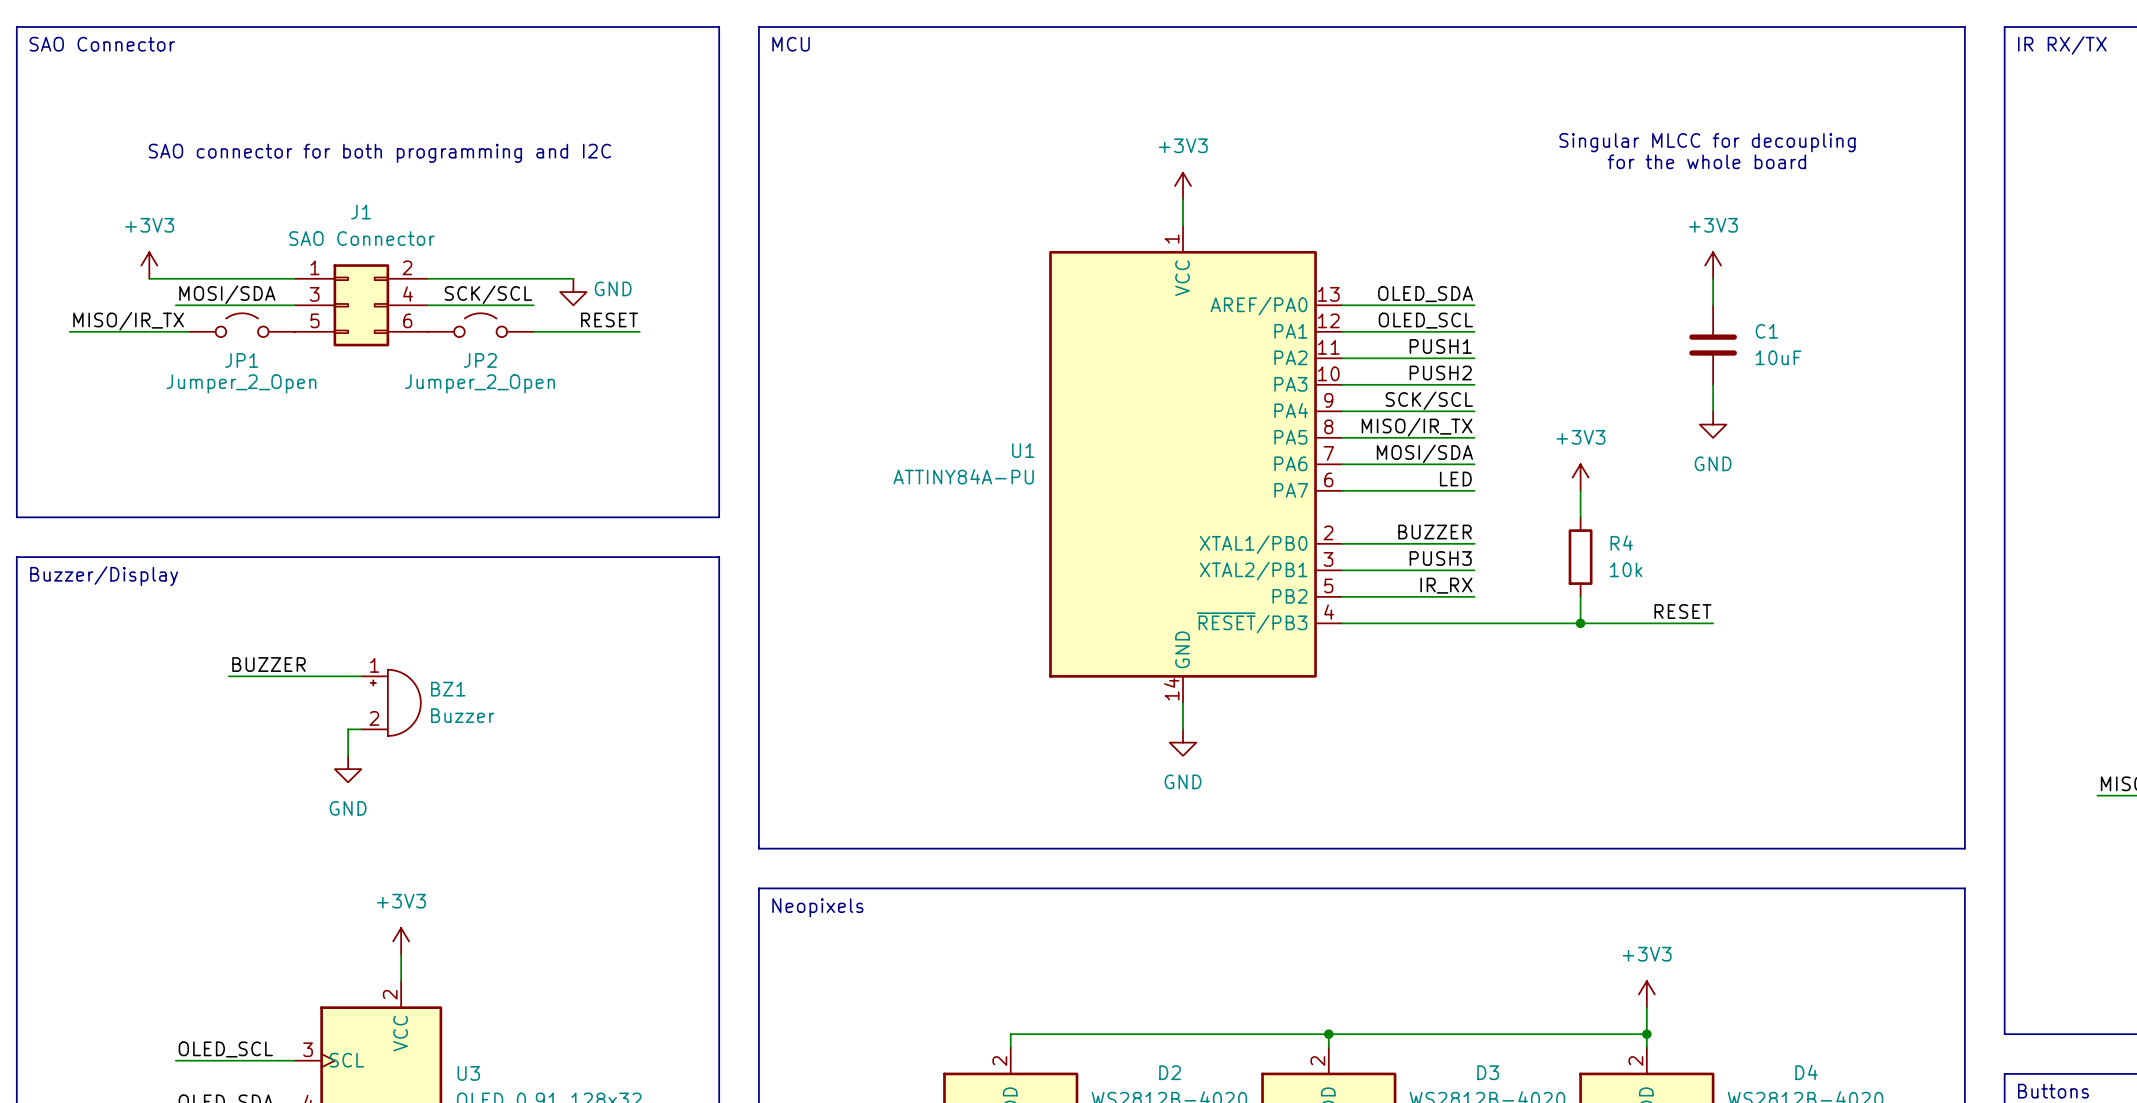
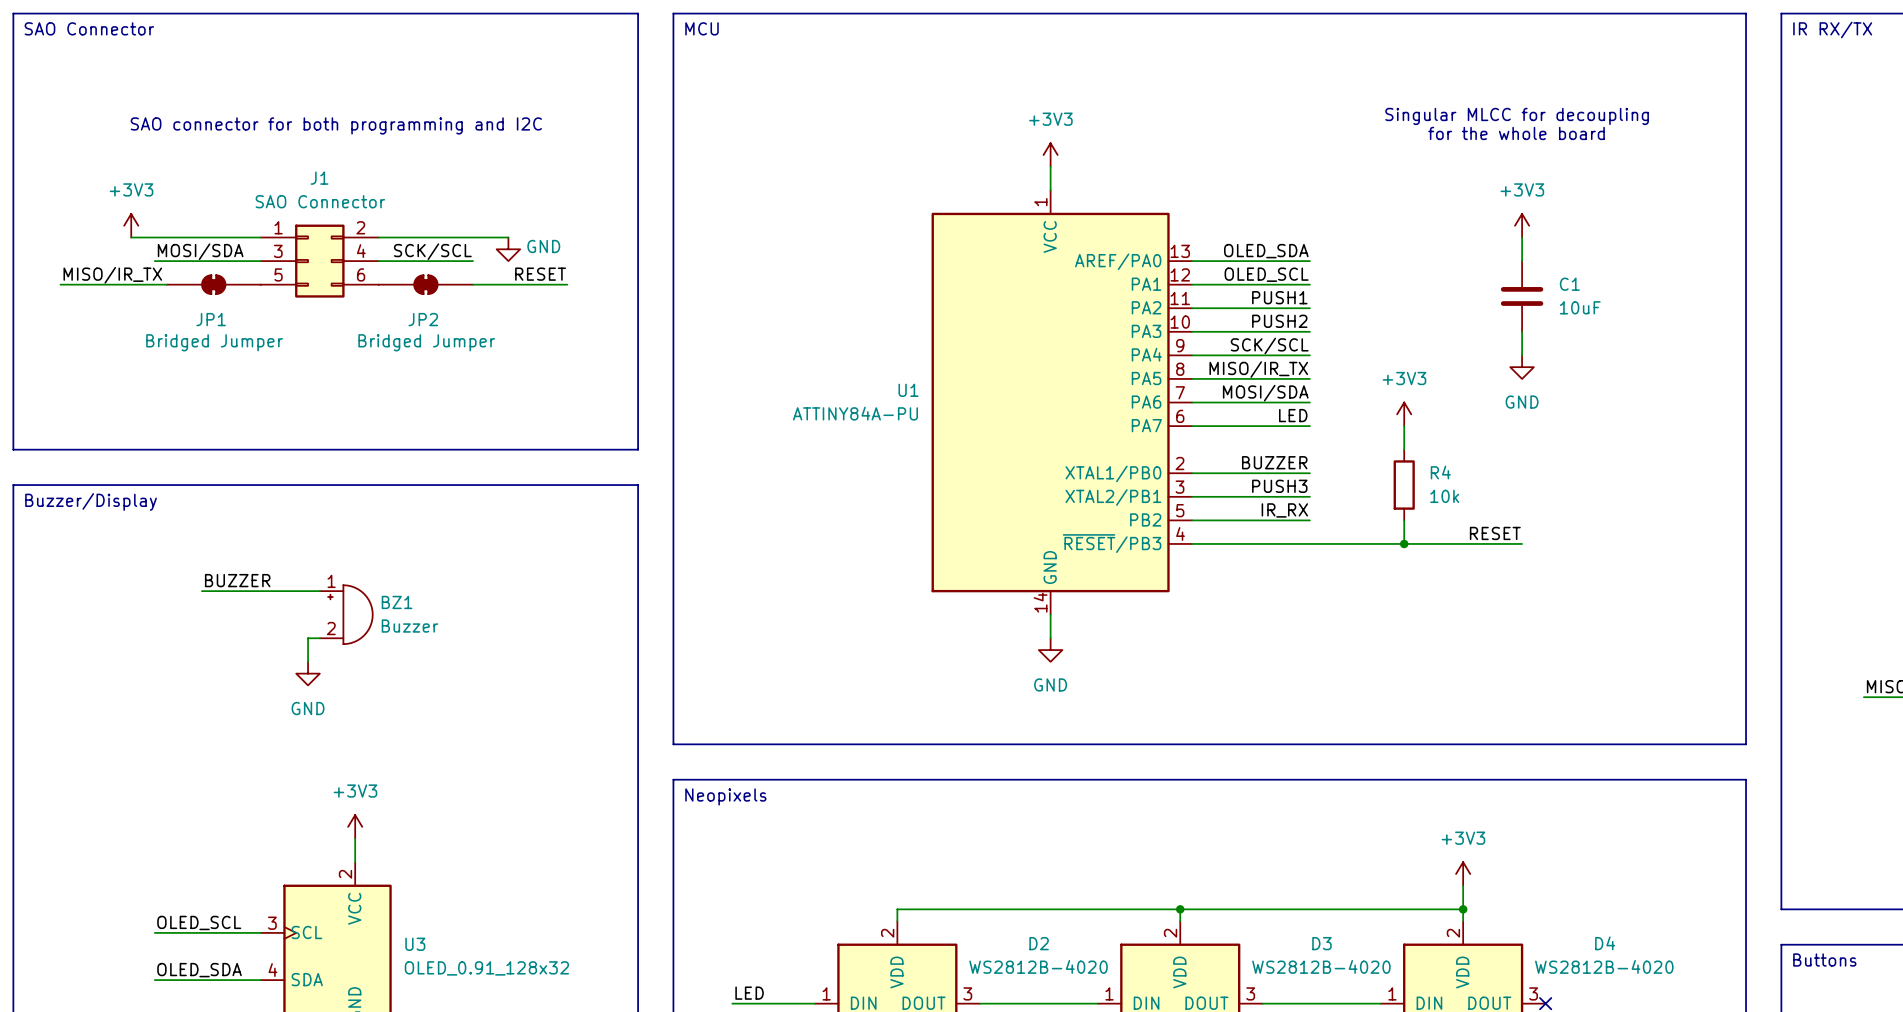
JP1 symbol: [189, 313, 296, 338] -> [166, 274, 261, 295]
JP2 symbol: [427, 313, 534, 338] -> [378, 274, 474, 295]
JP1 value: Jumper_2_Open (241, 383) -> Bridged Jumper (214, 342)
JP2 value: Jumper_2_Open (480, 383) -> Bridged Jumper (426, 342)

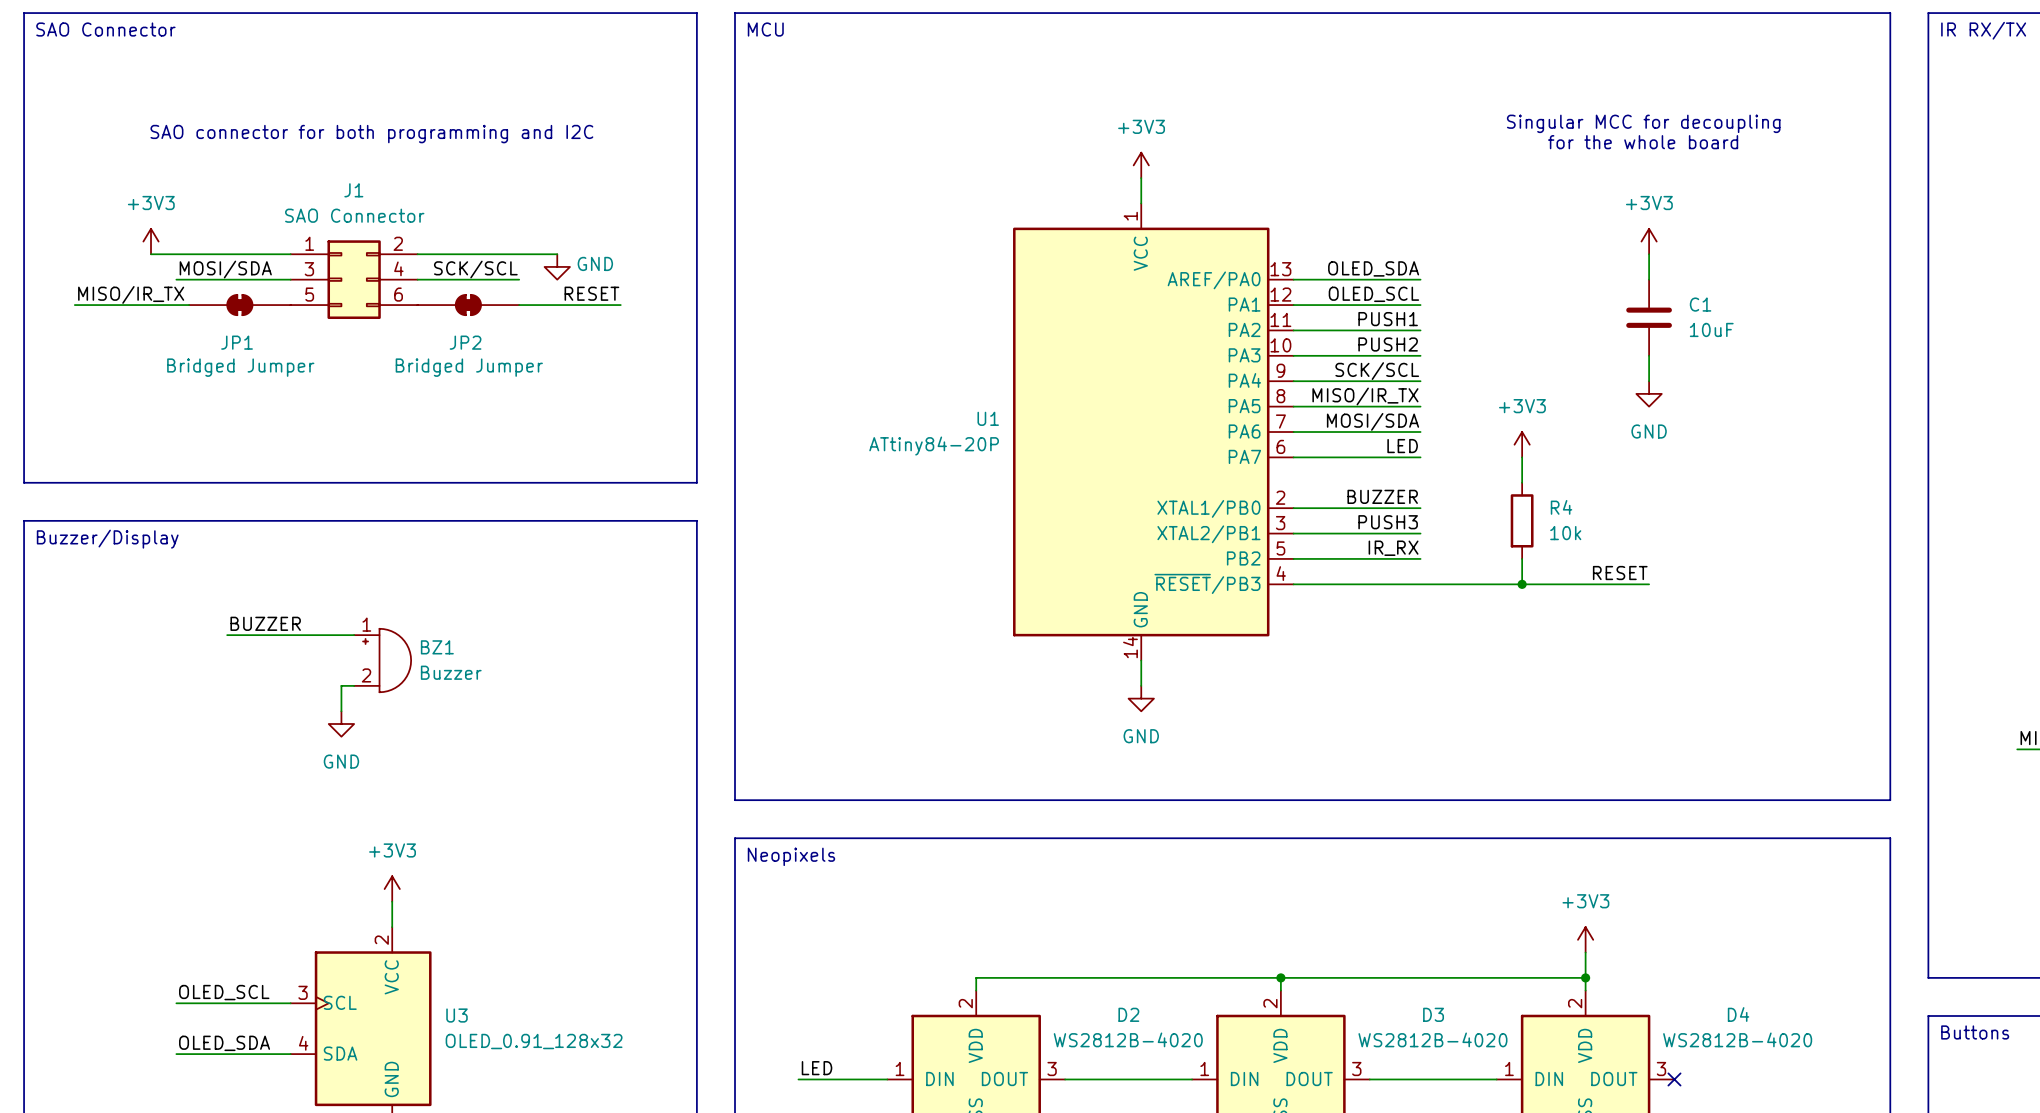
text: Singular MLCC for decoupling (1517, 116) -> Singular MCC for decoupling (1643, 123)
U1 value: ATTINY84A-PU (855, 413) -> ATtiny84-20P (934, 446)

